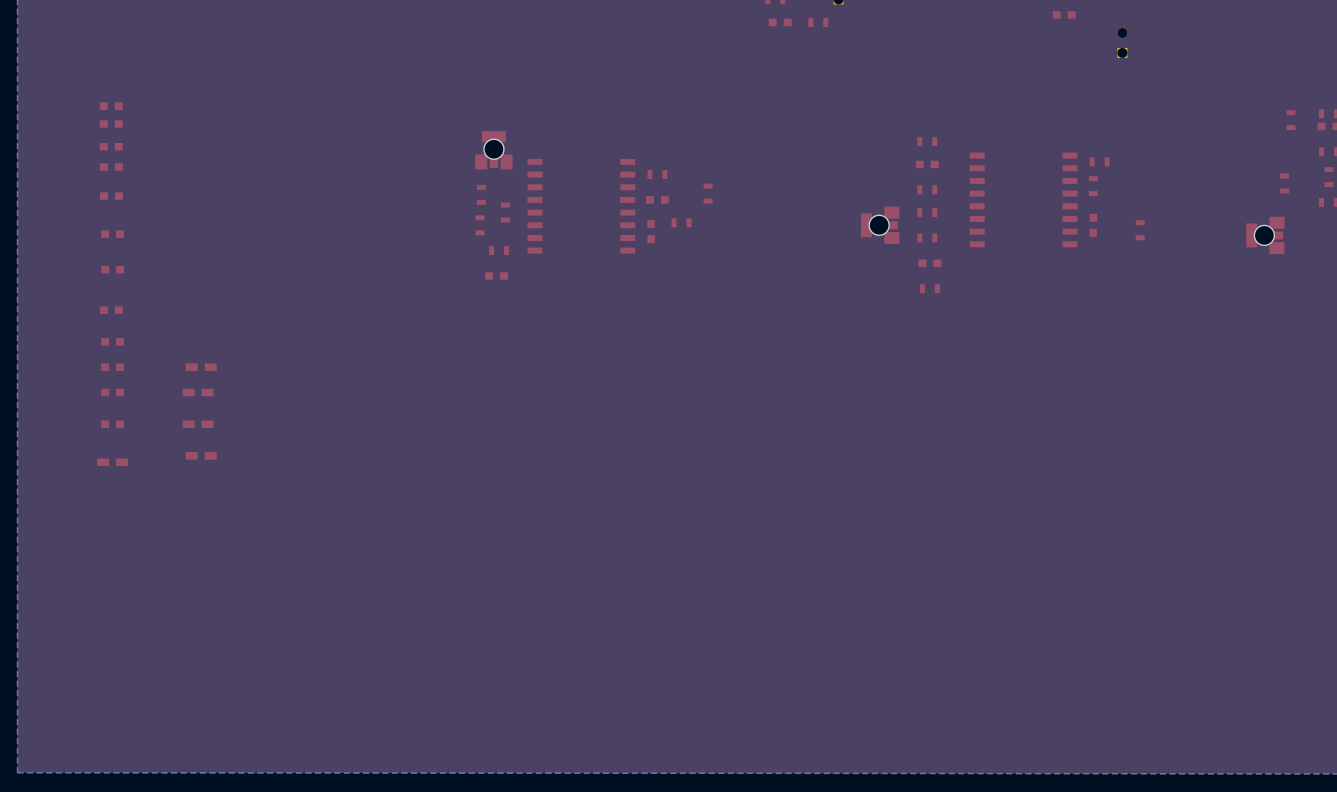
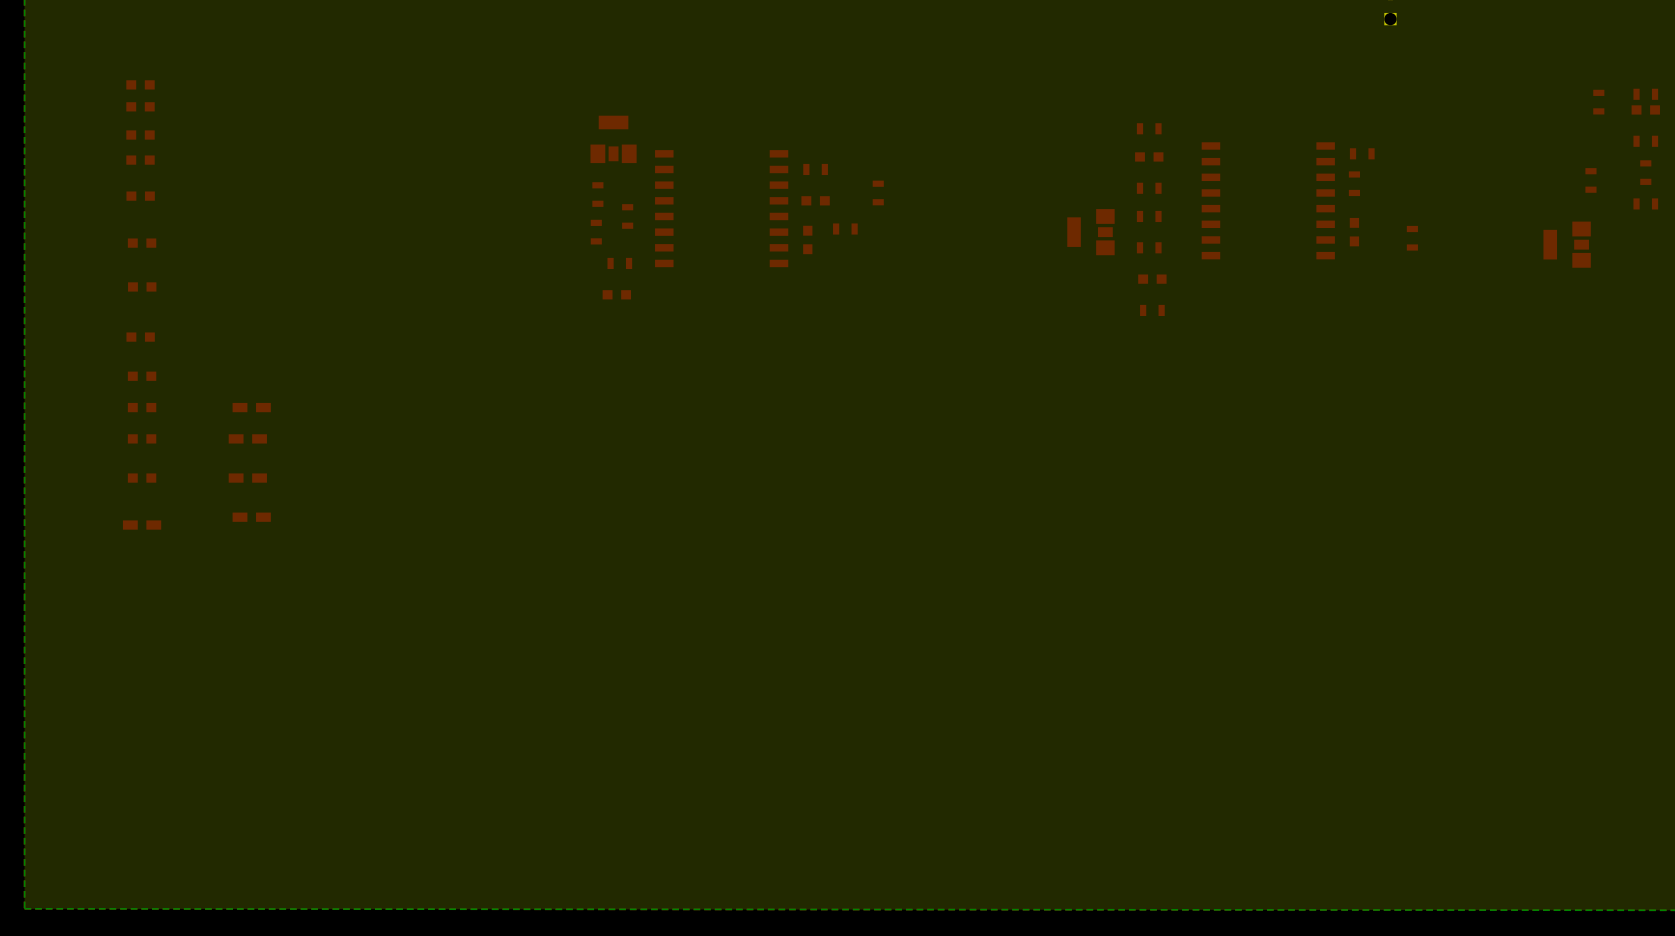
part footprint: [475, 131, 513, 170] -> [590, 115, 637, 164]
part footprint: [861, 206, 900, 244] -> [1067, 209, 1115, 256]
part footprint: [1246, 216, 1285, 255] -> [1543, 221, 1591, 268]

